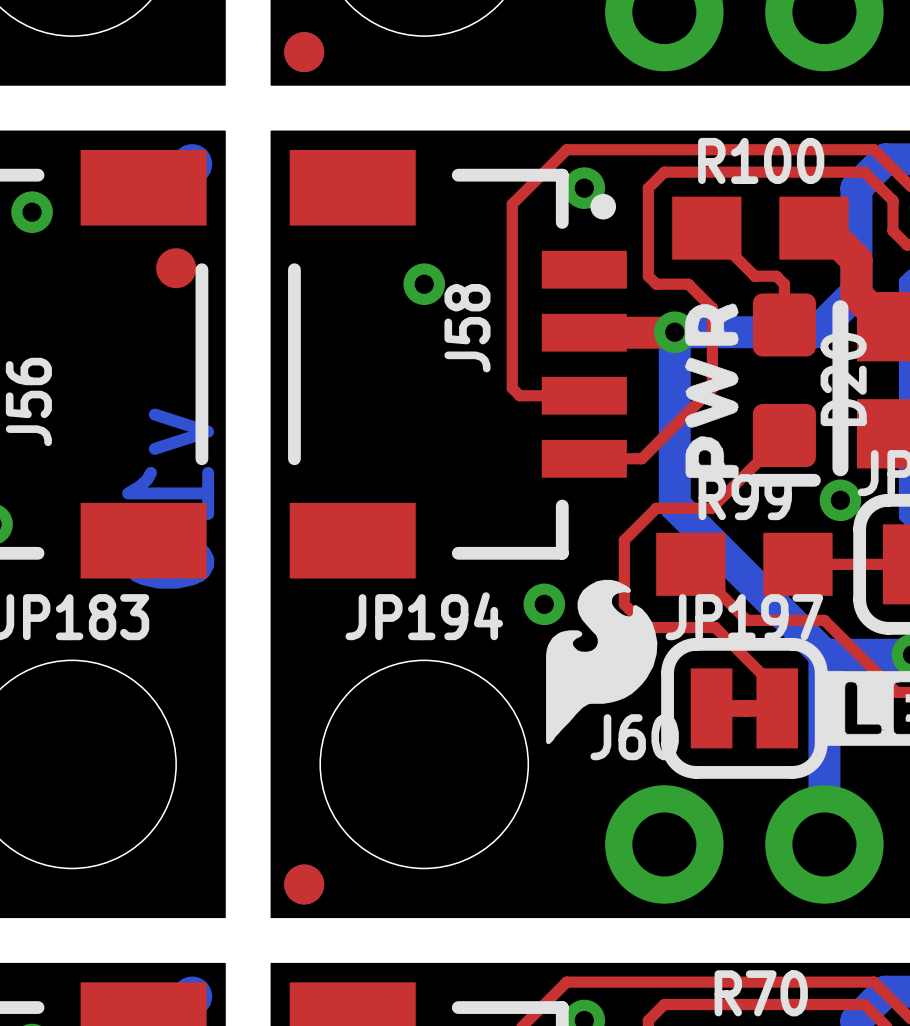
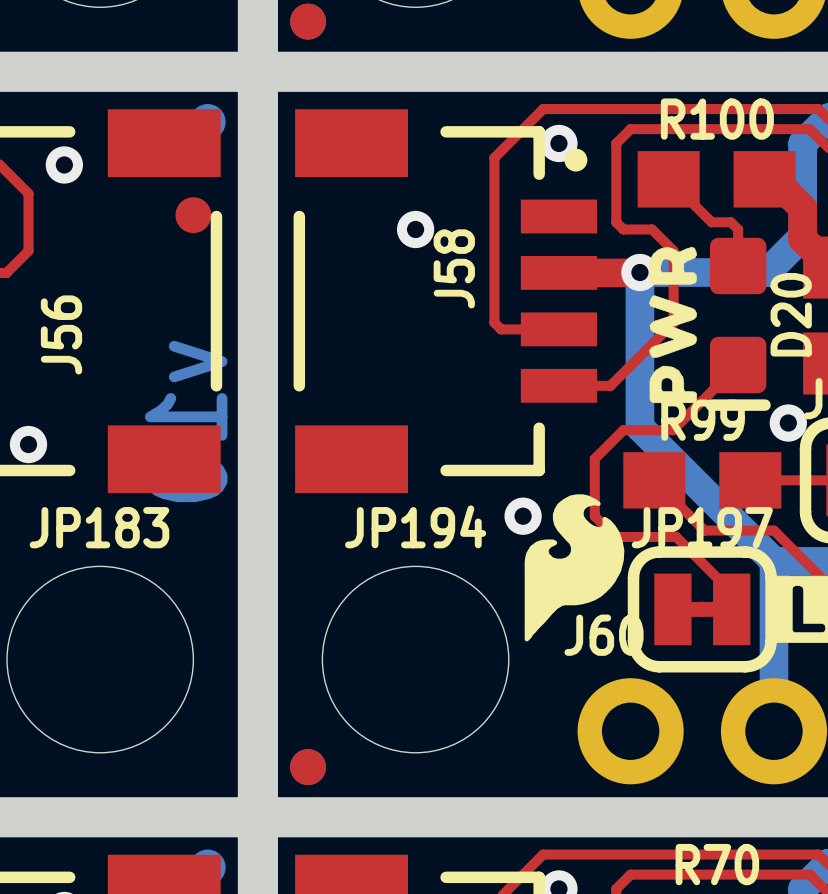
line: (840, 308) (840, 468) -> none

